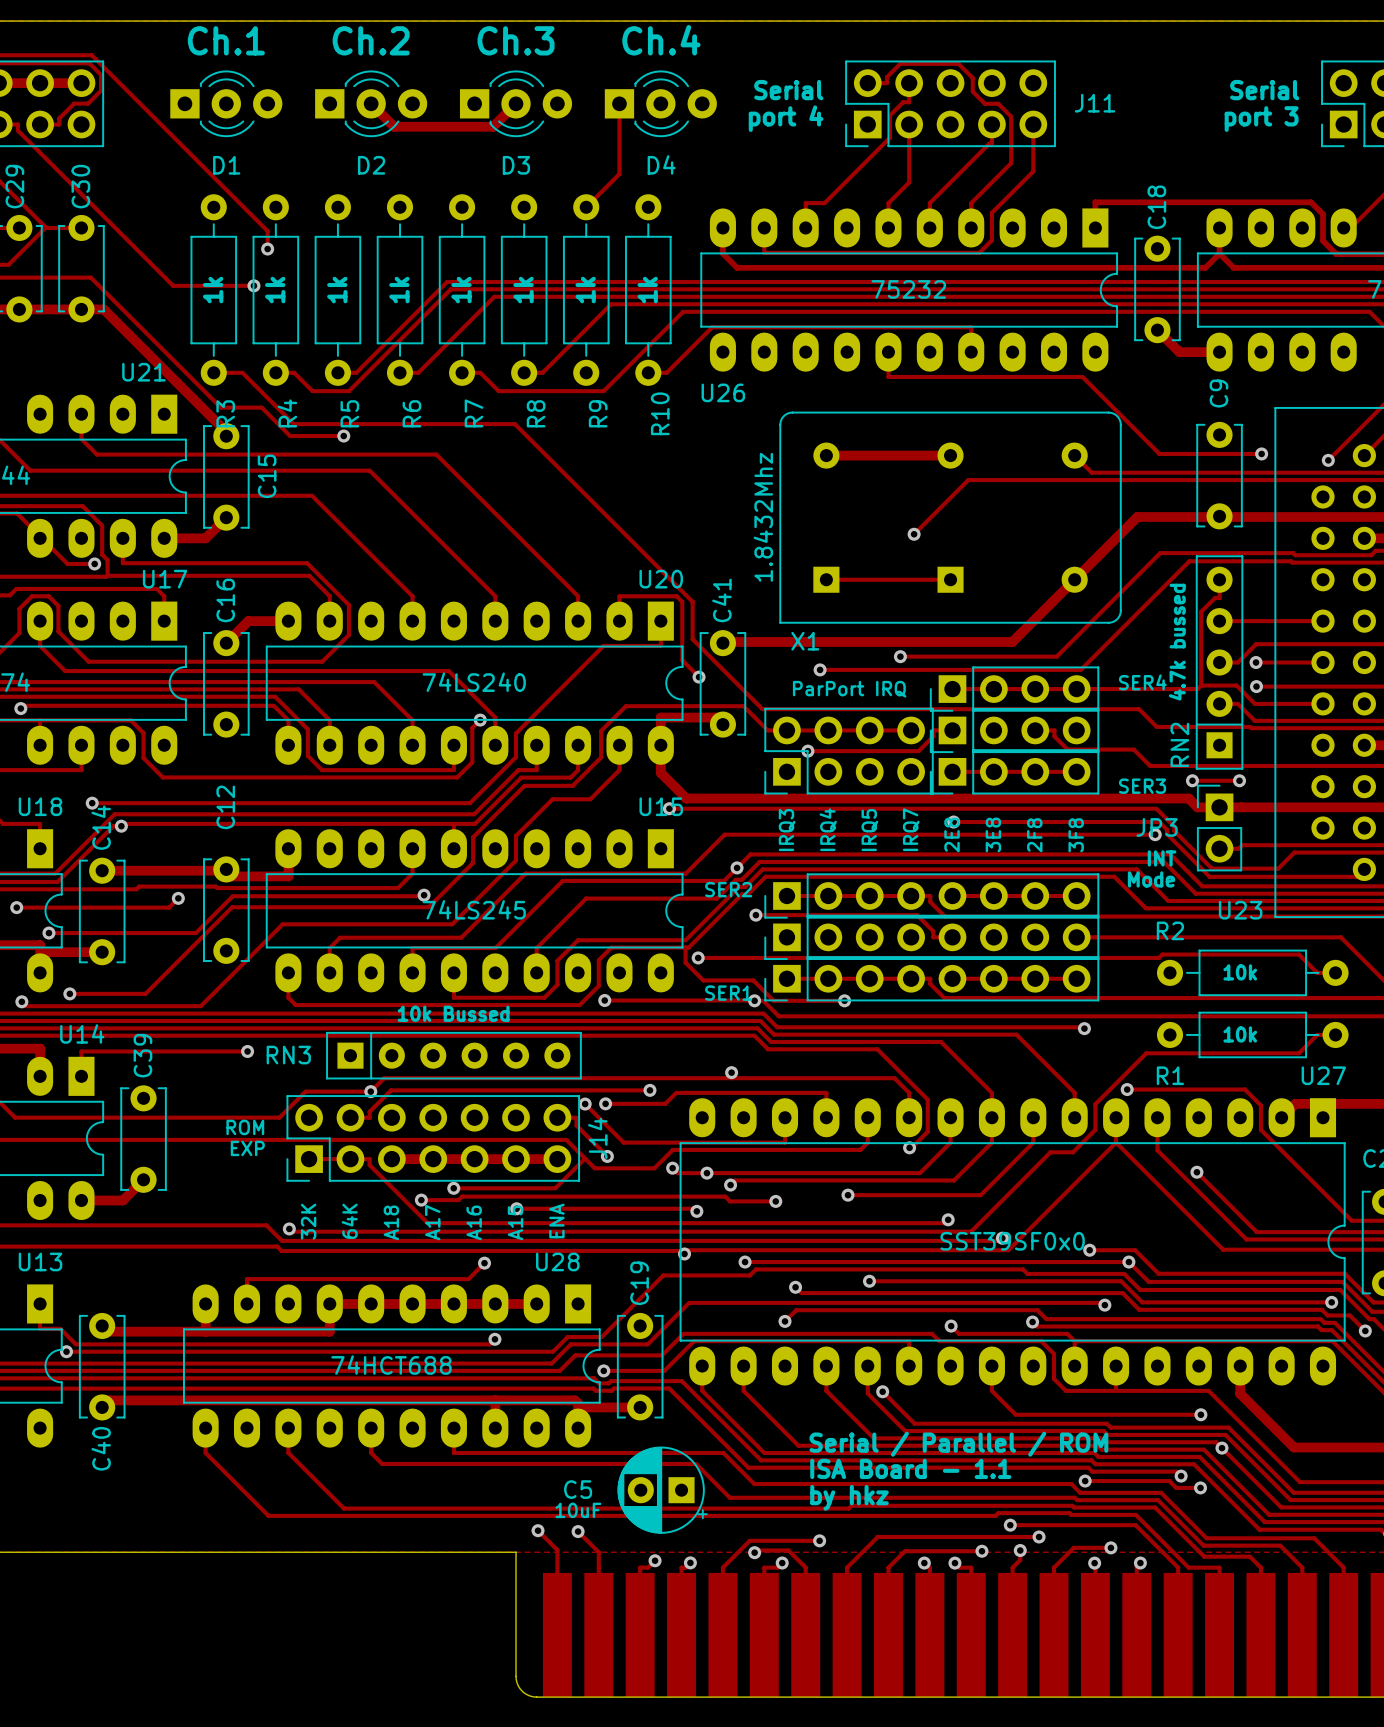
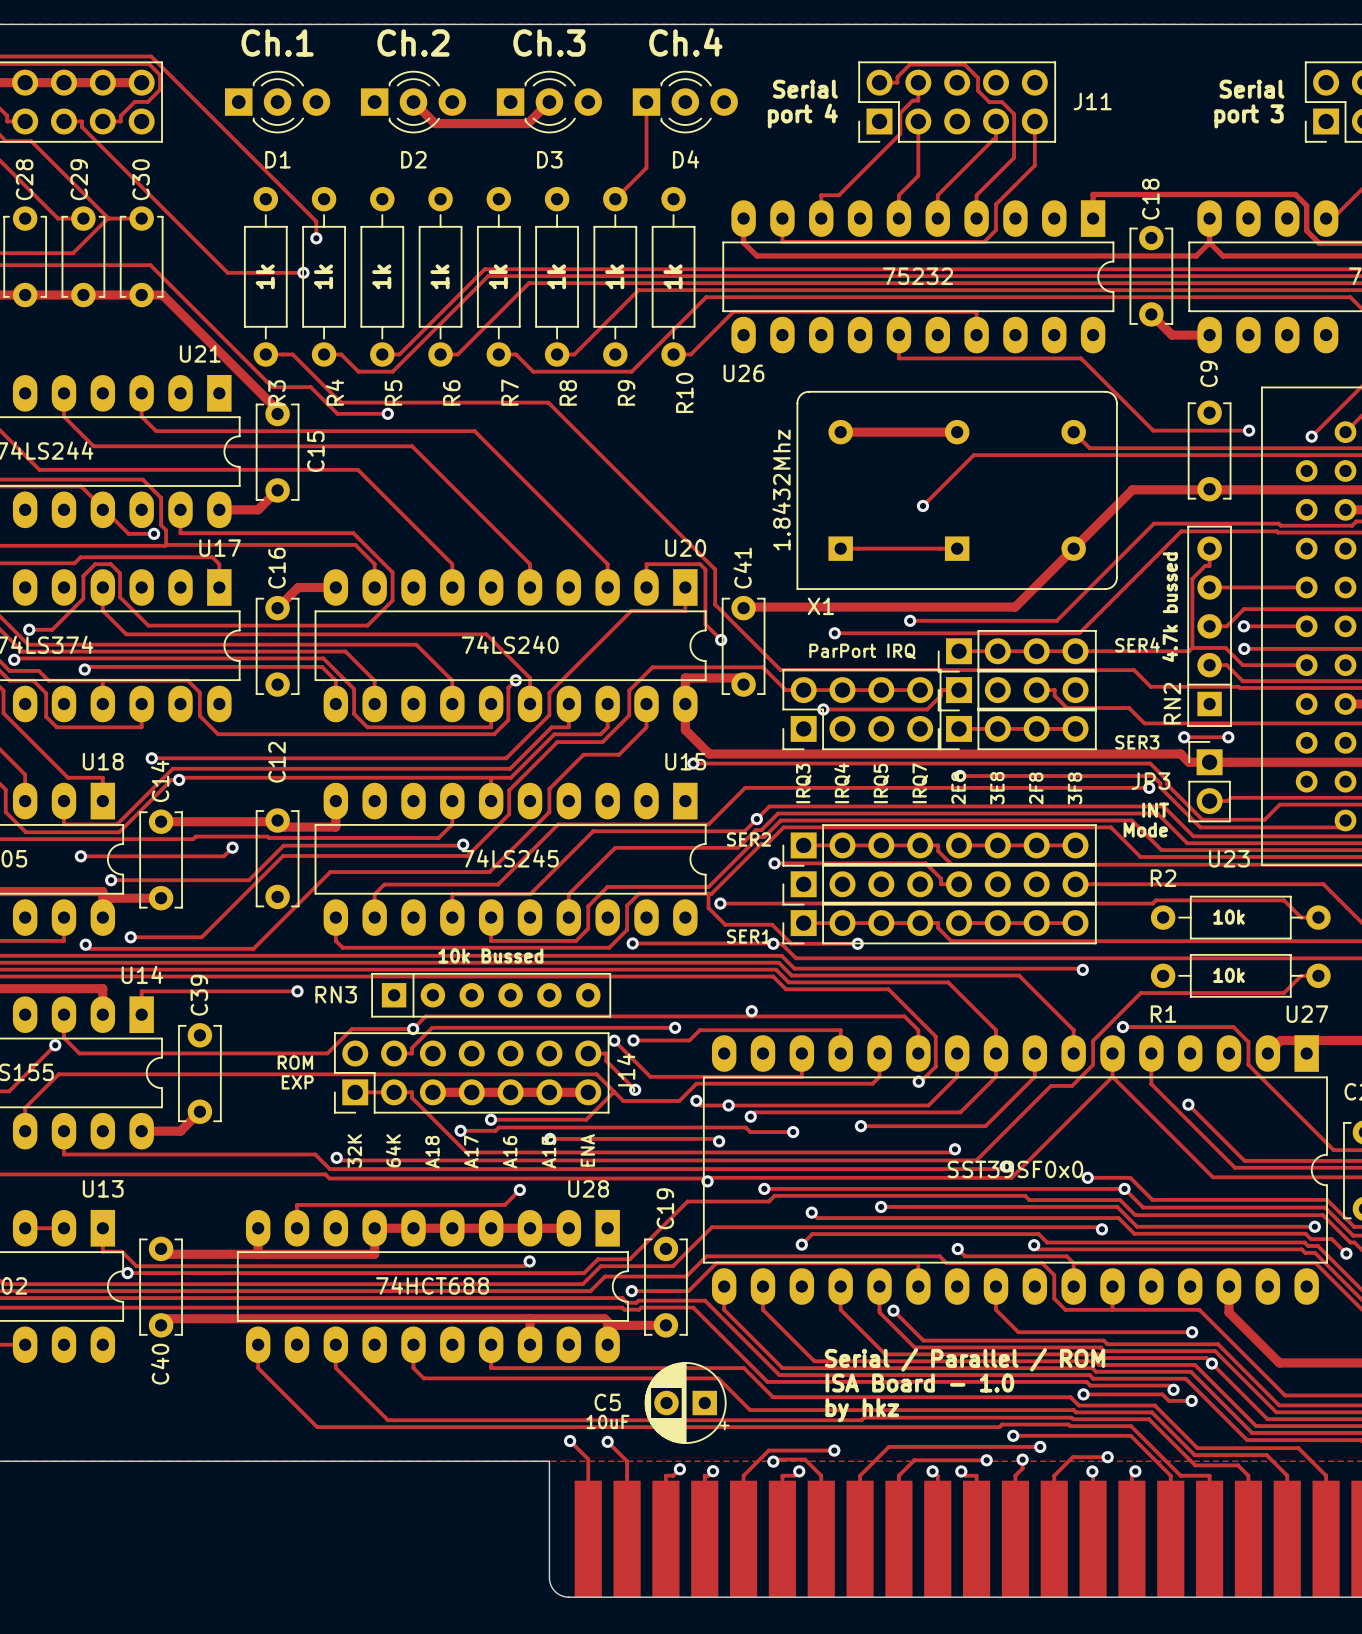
text: ISA Board - 1.1 (910, 1468) -> ISA Board - 1.0 (919, 1383)

